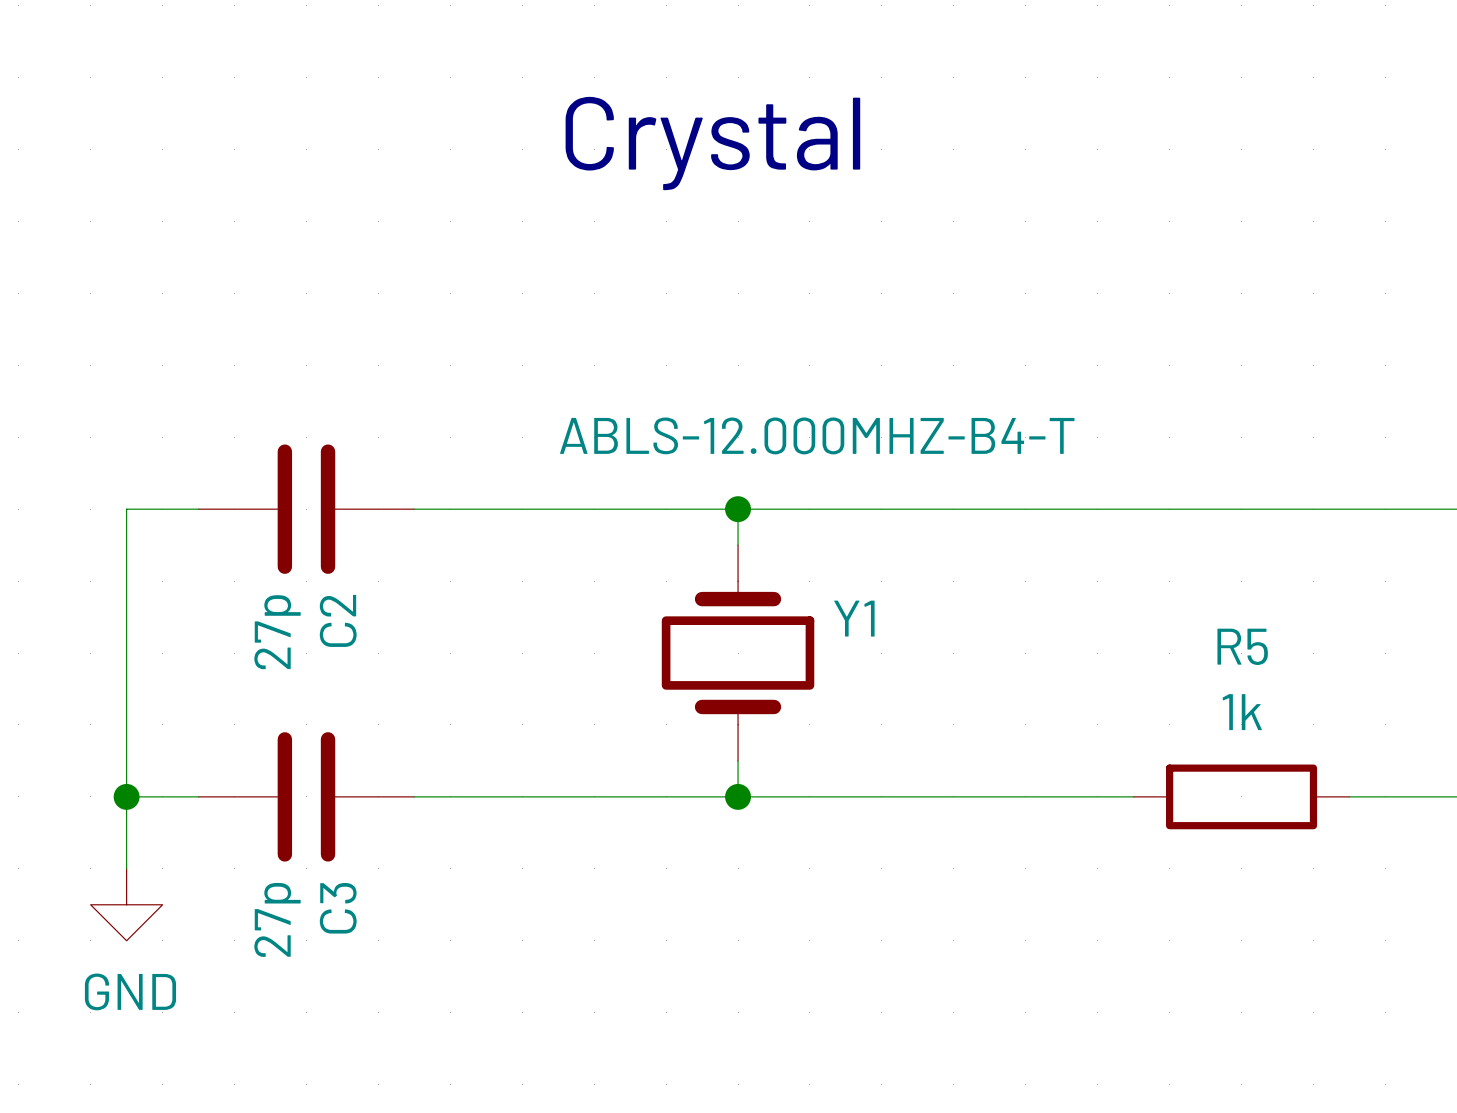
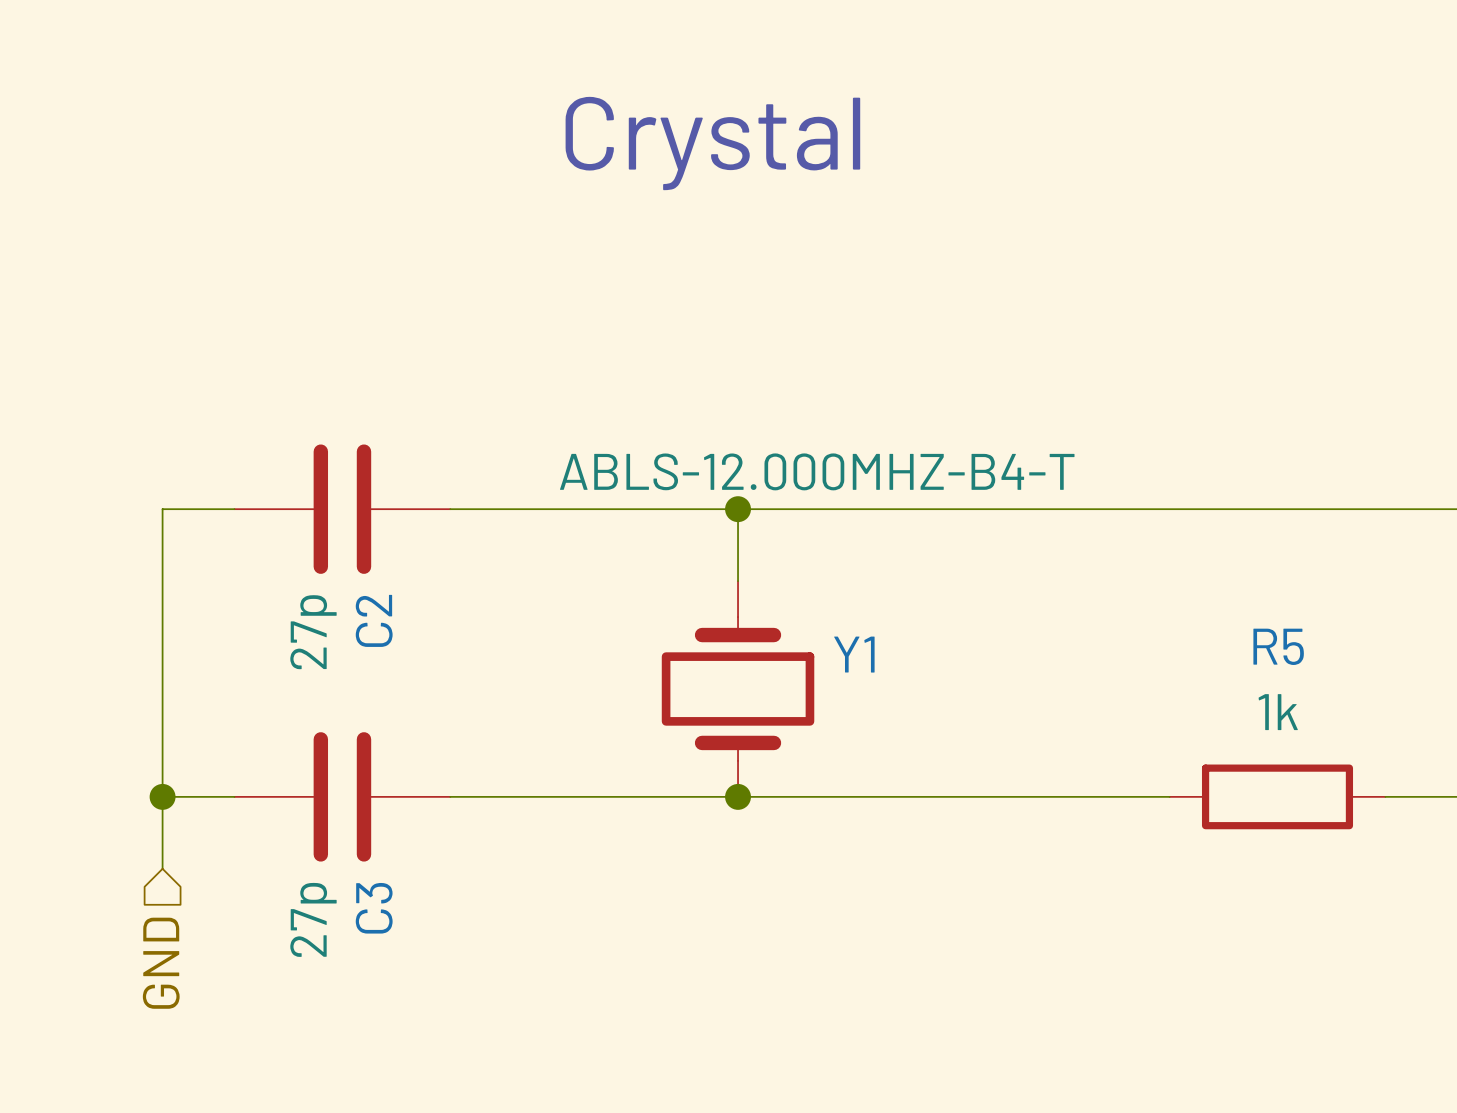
wire: (162, 509) (126, 509) (126, 868) -> (162, 509) (162, 868)
C2 position: (306, 509) -> (342, 509)
Y1 position: (738, 653) -> (738, 689)
wire: (126, 796) (162, 796) -> none
junction position: (126, 796) -> (162, 796)
C3 position: (306, 796) -> (342, 796)
R5 position: (1241, 796) -> (1277, 796)
power symbol: GND (126, 904) -> none
hierarchical label: none -> GND (161, 963)

